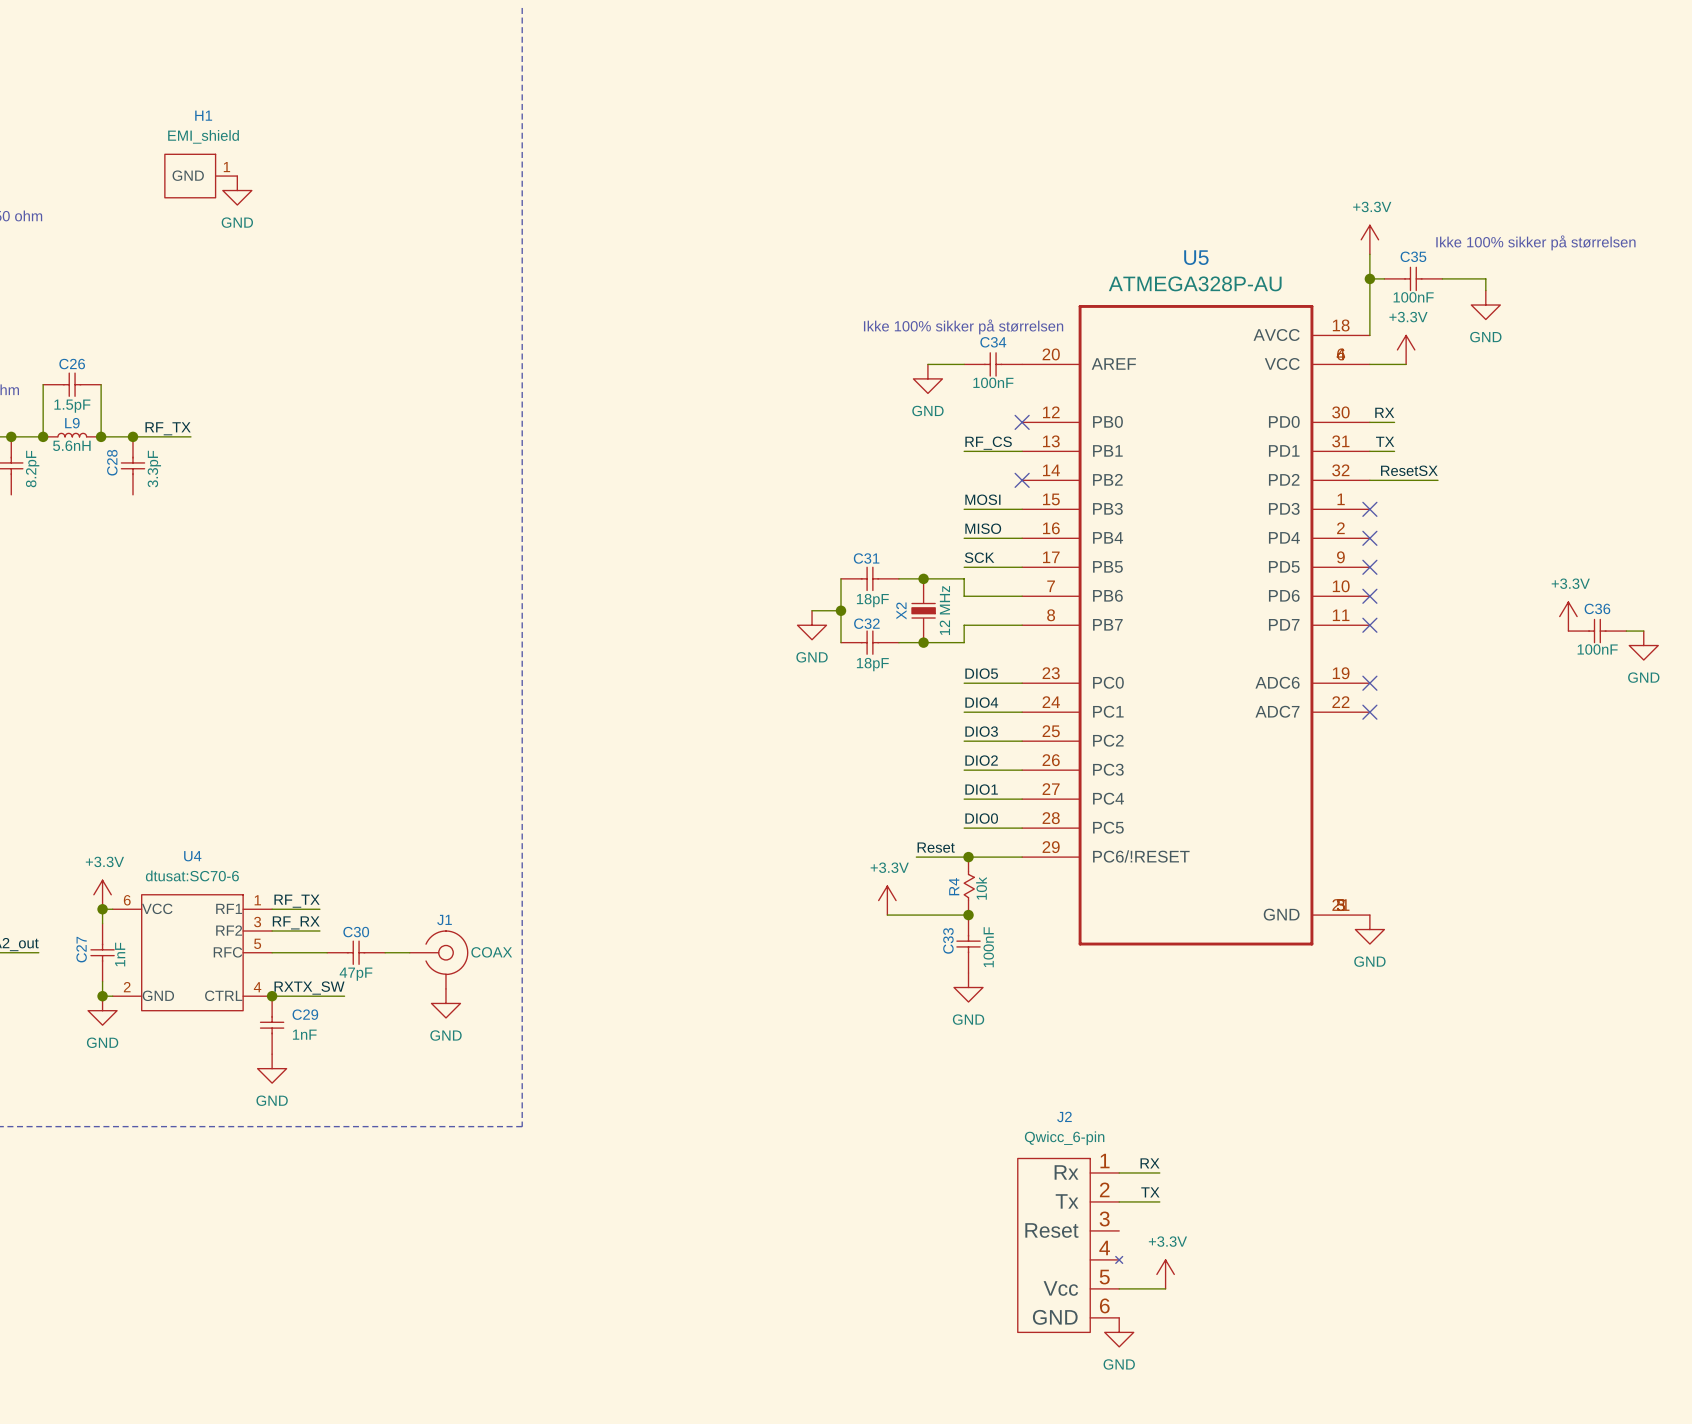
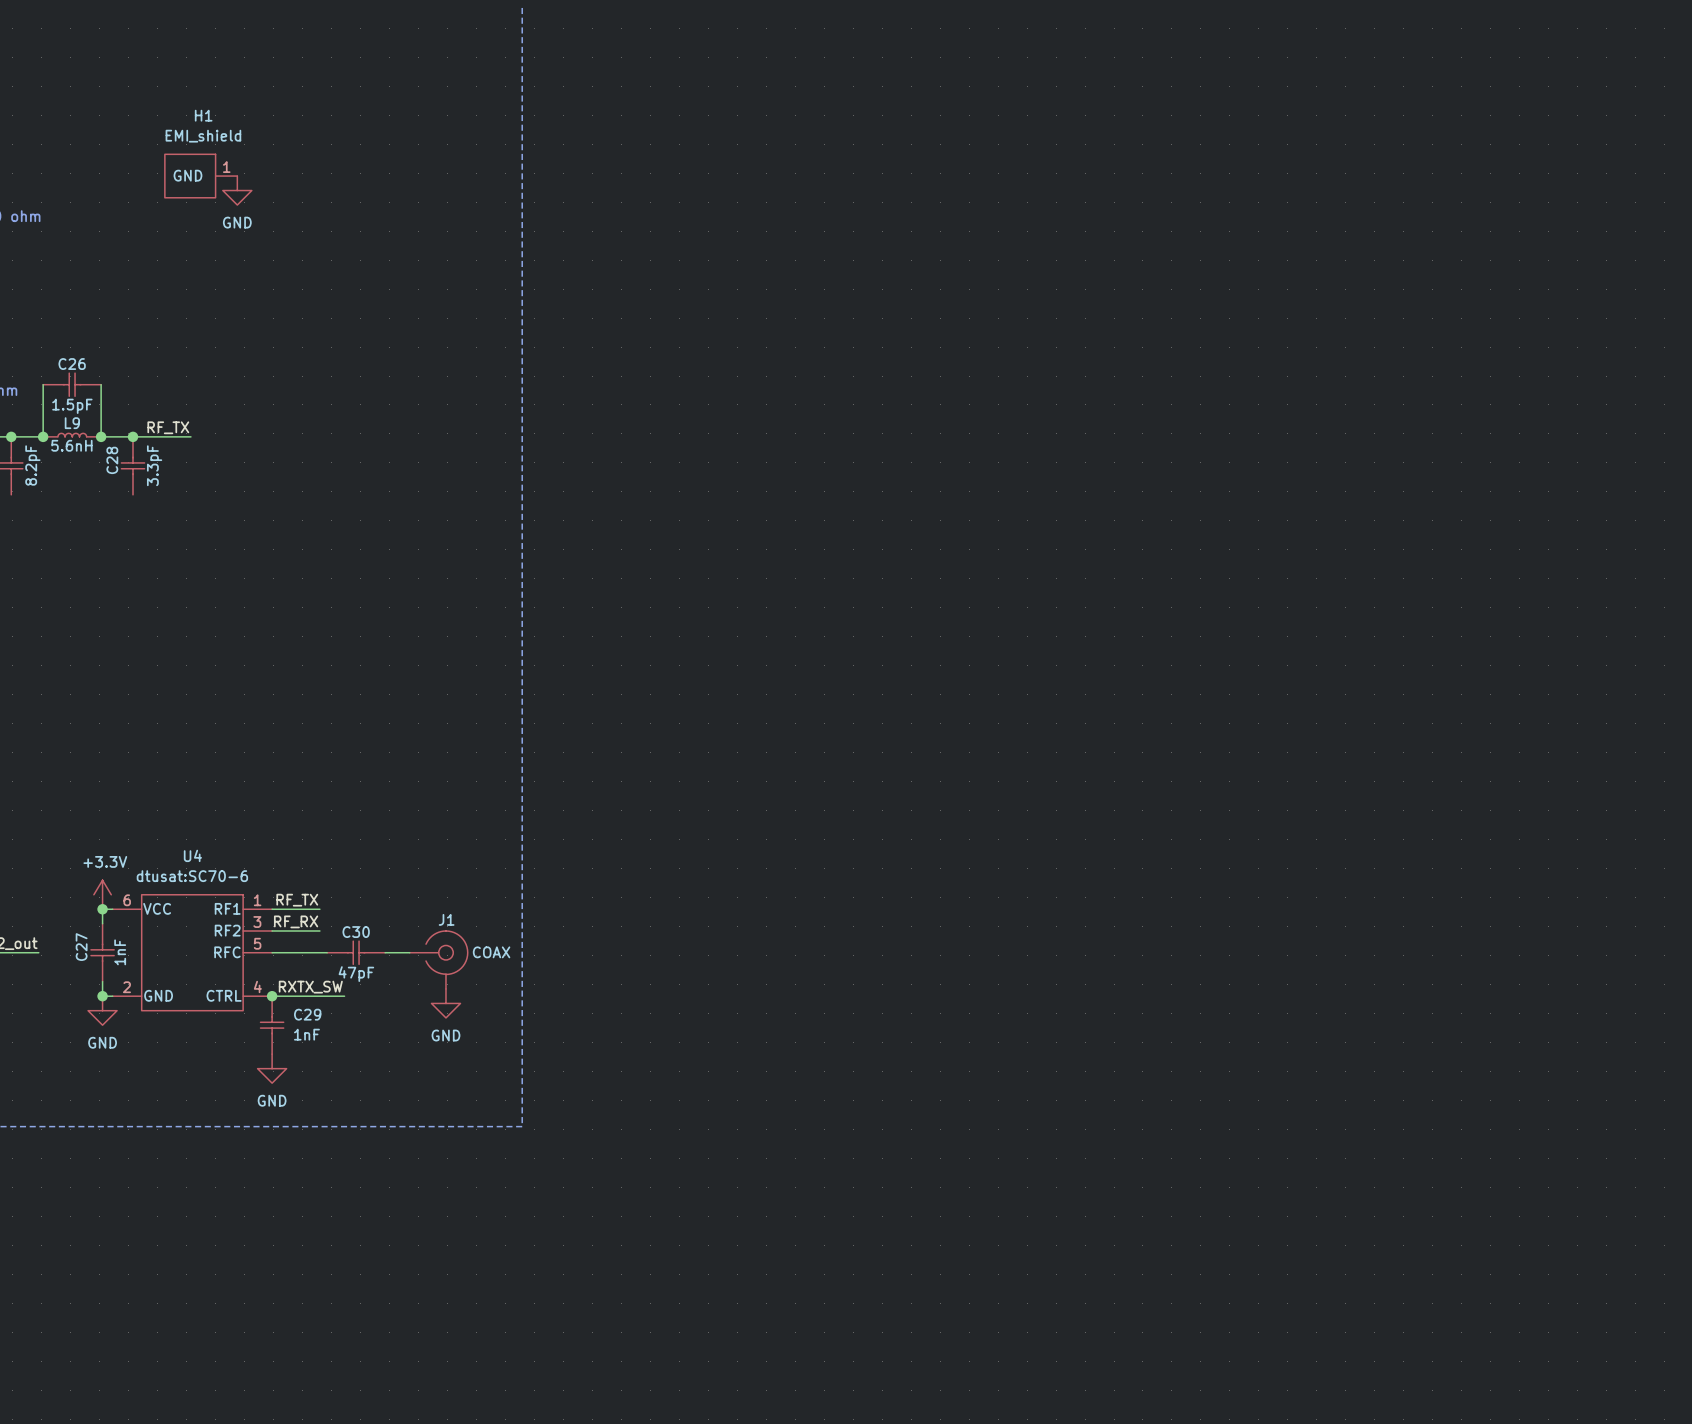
power symbol: +3.3V (1369, 239) -> none
text: Ikke 100% sikker på størrelsen (1535, 242) -> none
wire: (1369, 254) (1369, 335) -> none
wire: (1369, 278) (1384, 278) -> none
junction: (1369, 278) -> none
C35: (1413, 278) -> none
wire: (1442, 278) (1485, 278) (1485, 290) -> none
power symbol: GND (1485, 305) -> none
text: Ikke 100% sikker på størrelsen (963, 326) -> none
power symbol: +3.3V (1406, 349) -> none
wire: (927, 364) (964, 364) -> none
C34: (993, 364) -> none
wire: (1369, 364) (1406, 364) -> none
power symbol: GND (927, 378) -> none
label: RX (1384, 412) -> none
no-connect mark: (1022, 422) -> none
wire: (1369, 422) (1394, 422) -> none
label: TX (1385, 441) -> none
label: RF_CS (988, 443) -> none
wire: (964, 451) (1022, 451) -> none
wire: (1369, 451) (1394, 451) -> none
label: ResetSX (1409, 470) -> none
no-connect mark: (1022, 480) -> none
wire: (1369, 480) (1438, 480) -> none
label: MOSI (982, 499) -> none
wire: (964, 509) (1022, 509) -> none
no-connect mark: (1369, 509) -> none
label: MISO (983, 528) -> none
wire: (964, 538) (1022, 538) -> none
no-connect mark: (1369, 538) -> none
label: SCK (979, 557) -> none
wire: (964, 567) (1022, 567) -> none
no-connect mark: (1369, 567) -> none
wire: (840, 578) (840, 642) -> none
C31: (869, 578) -> none
wire: (898, 578) (964, 578) (964, 596) (1022, 596) -> none
junction: (923, 578) -> none
no-connect mark: (1369, 596) -> none
wire: (812, 610) (840, 610) -> none
junction: (840, 610) -> none
X2: (923, 610) -> none
power symbol: +3.3V (1568, 616) -> none
power symbol: GND (812, 625) -> none
wire: (1022, 625) (964, 625) (964, 642) (898, 642) -> none
U5: ATMEGA328P-AU (1196, 625) -> none
no-connect mark: (1369, 625) -> none
C36: (1597, 631) -> none
wire: (1626, 631) (1643, 631) -> none
C32: (869, 642) -> none
junction: (923, 642) -> none
power symbol: GND (1643, 645) -> none
label: DIO5 (981, 673) -> none
wire: (964, 683) (1022, 683) -> none
no-connect mark: (1369, 683) -> none
label: DIO4 (981, 702) -> none
wire: (964, 712) (1022, 712) -> none
no-connect mark: (1369, 712) -> none
label: DIO3 (981, 731) -> none
wire: (964, 741) (1022, 741) -> none
label: DIO2 (981, 760) -> none
wire: (964, 770) (1022, 770) -> none
label: DIO1 (981, 789) -> none
wire: (964, 799) (1022, 799) -> none
label: DIO0 (981, 818) -> none
wire: (964, 828) (1022, 828) -> none
label: Reset (936, 847) -> none
wire: (916, 857) (1022, 857) -> none
junction: (968, 857) -> none
R4: (969, 886) -> none
power symbol: +3.3V (887, 900) -> none
wire: (887, 915) (968, 915) -> none
junction: (968, 915) -> none
power symbol: GND (1369, 929) -> none
C33: (968, 944) -> none
power symbol: GND (968, 987) -> none
label: RX (1149, 1163) -> none
wire: (1119, 1172) (1159, 1172) -> none
label: TX (1150, 1192) -> none
wire: (1119, 1201) (1159, 1201) -> none
J2: Qwicc_6-pin (1070, 1245) -> none
power symbol: +3.3V (1165, 1274) -> none
wire: (1119, 1288) (1165, 1288) -> none
power symbol: GND (1119, 1332) -> none

